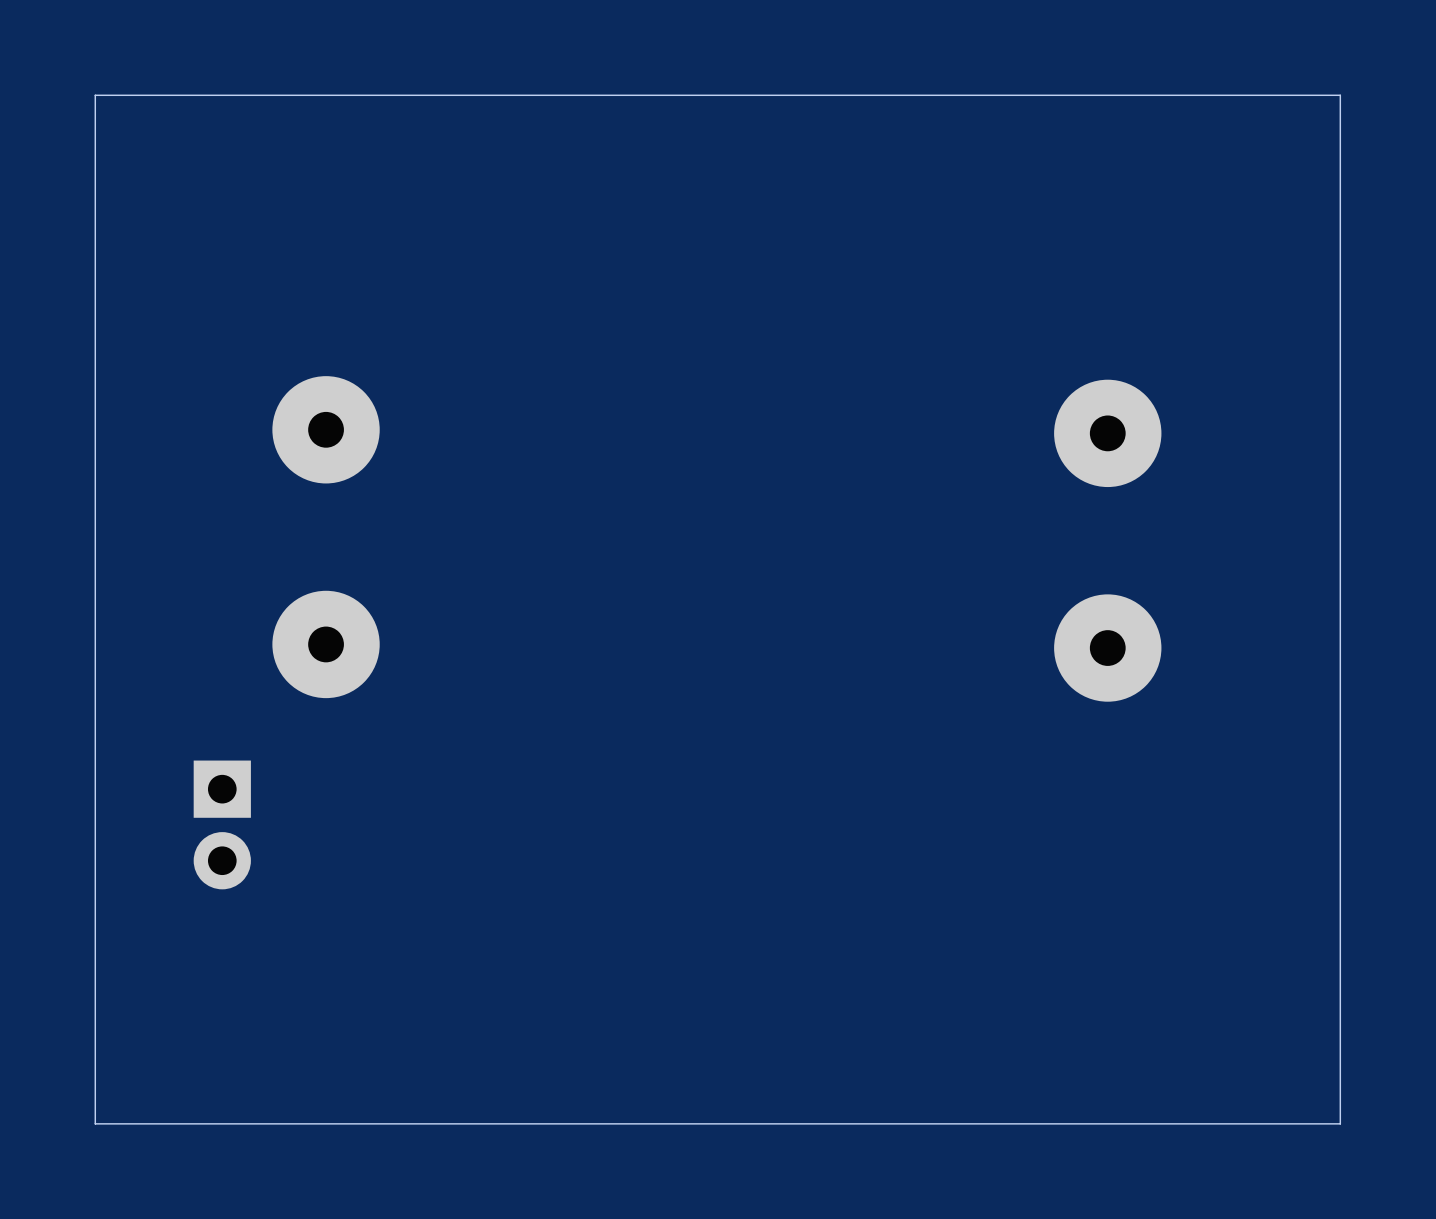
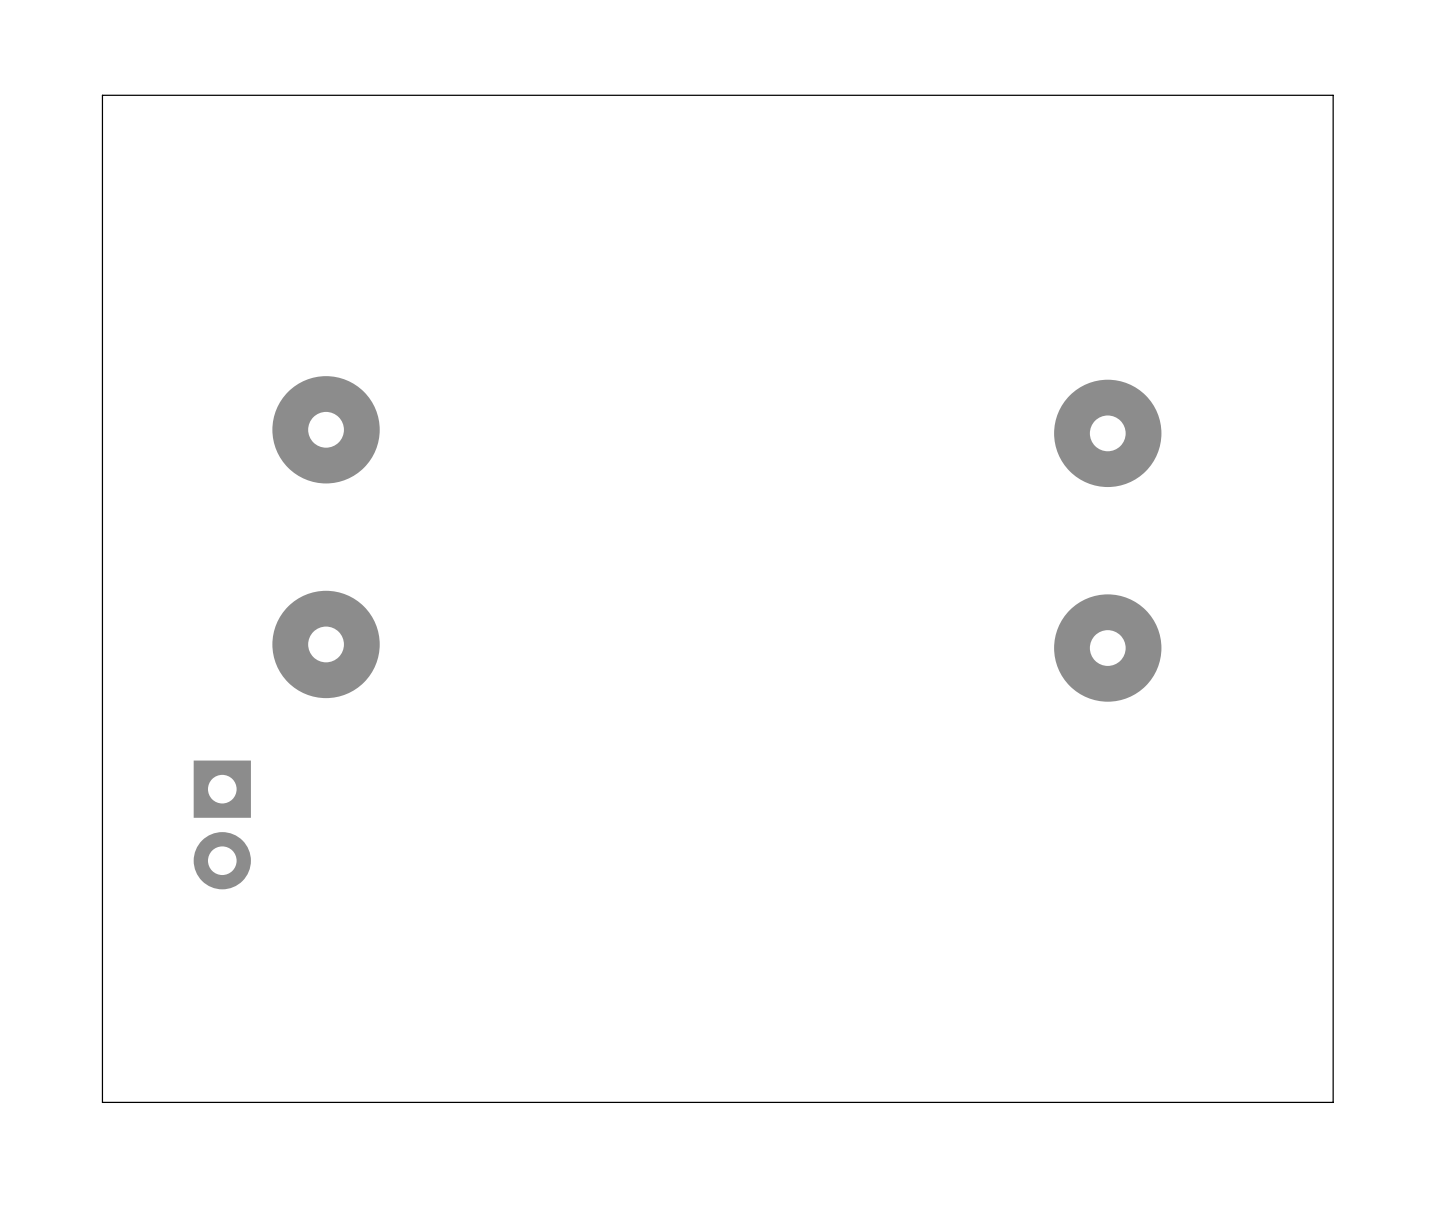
board edge: (1333, 95) (1340, 95) (1340, 1123) (95, 1123) (95, 95) (102, 95) -> (1333, 95) (1333, 1102) (102, 1102) (102, 95)

